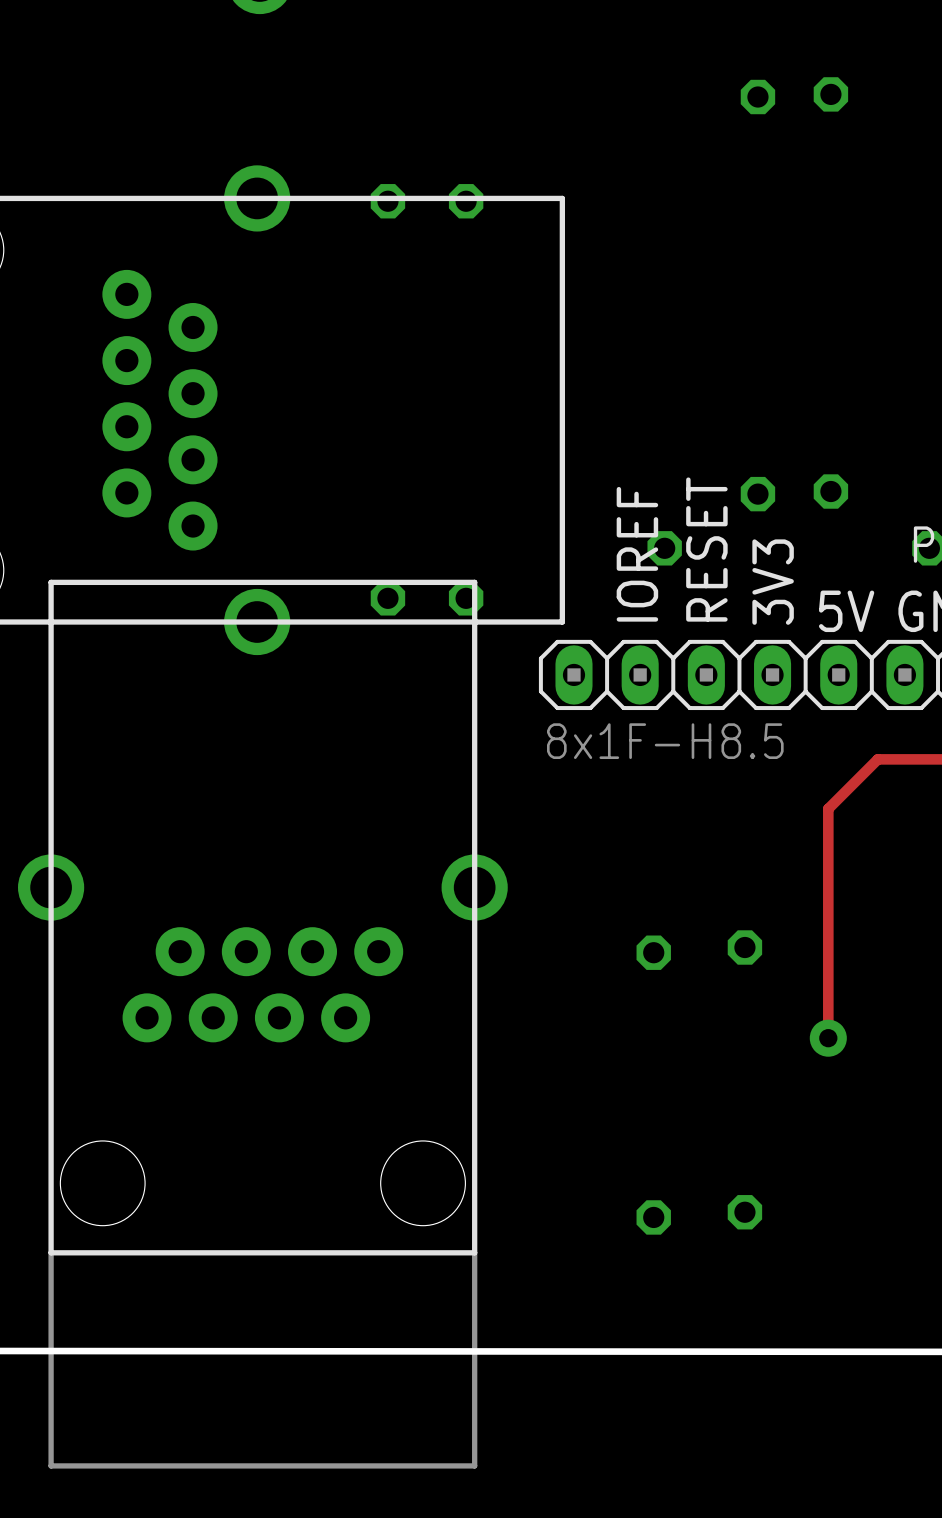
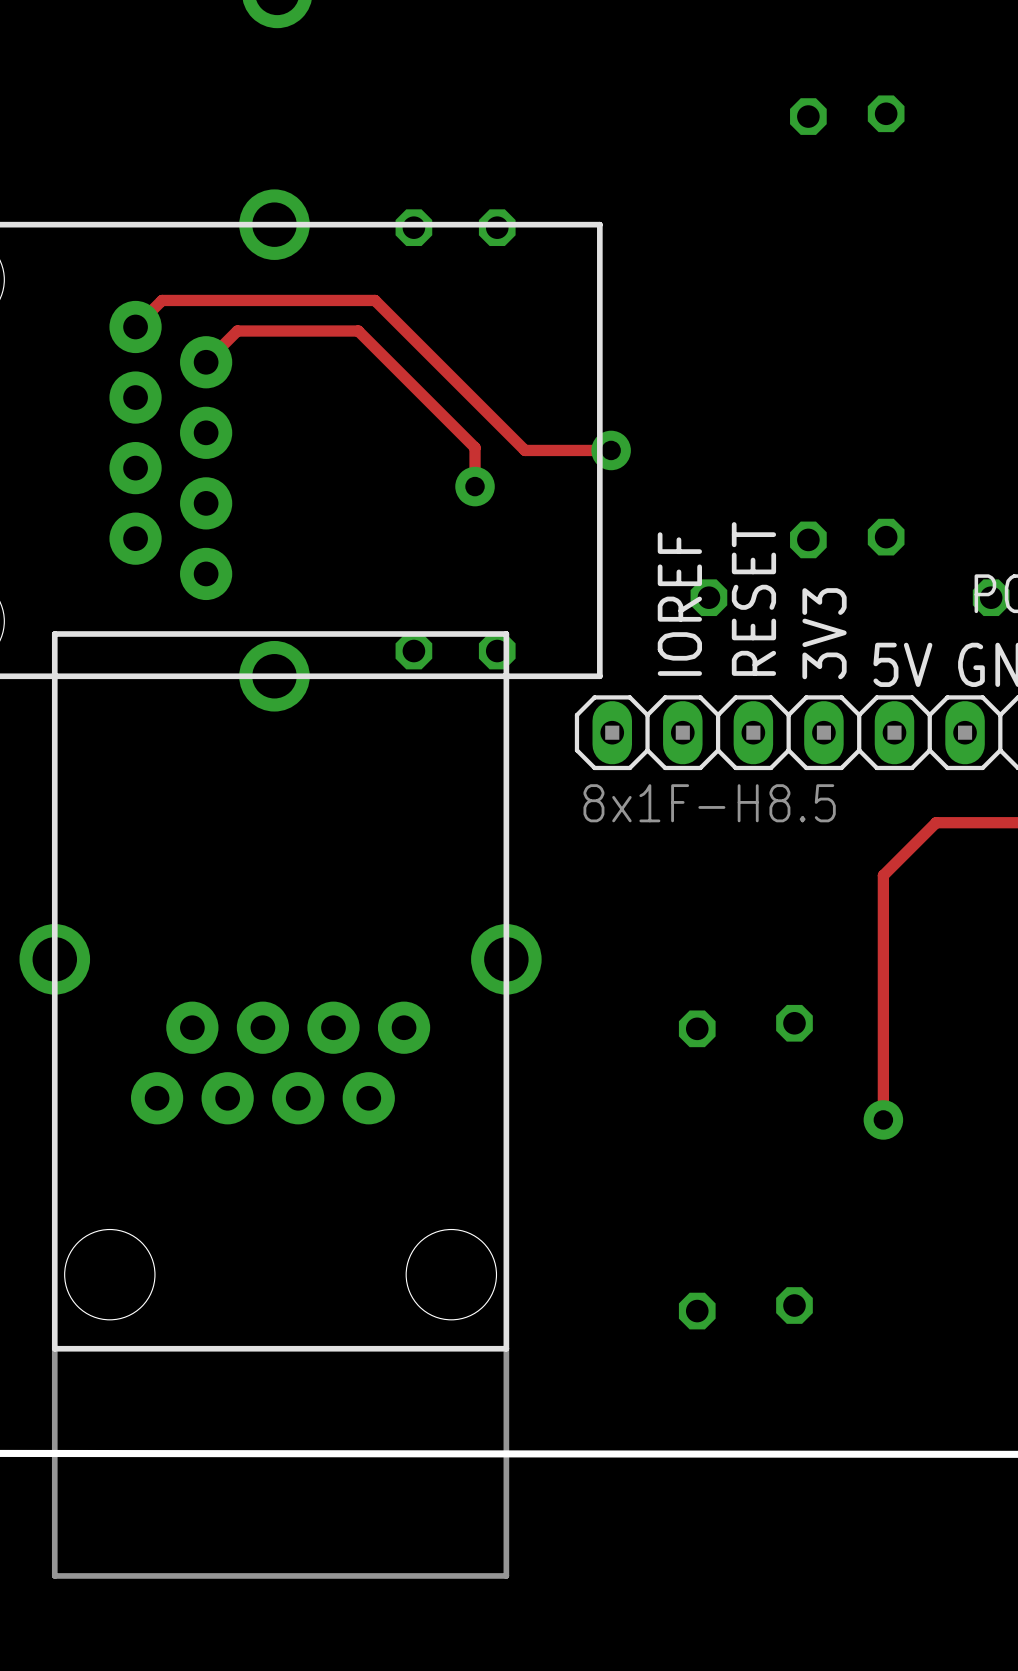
track: none -> (135, 326) (162, 300) (375, 300) (525, 450) (611, 450)
track: none -> (206, 362) (237, 331) (358, 331) (475, 447) (475, 486)
via: none -> (611, 450)
via: none -> (475, 486)

